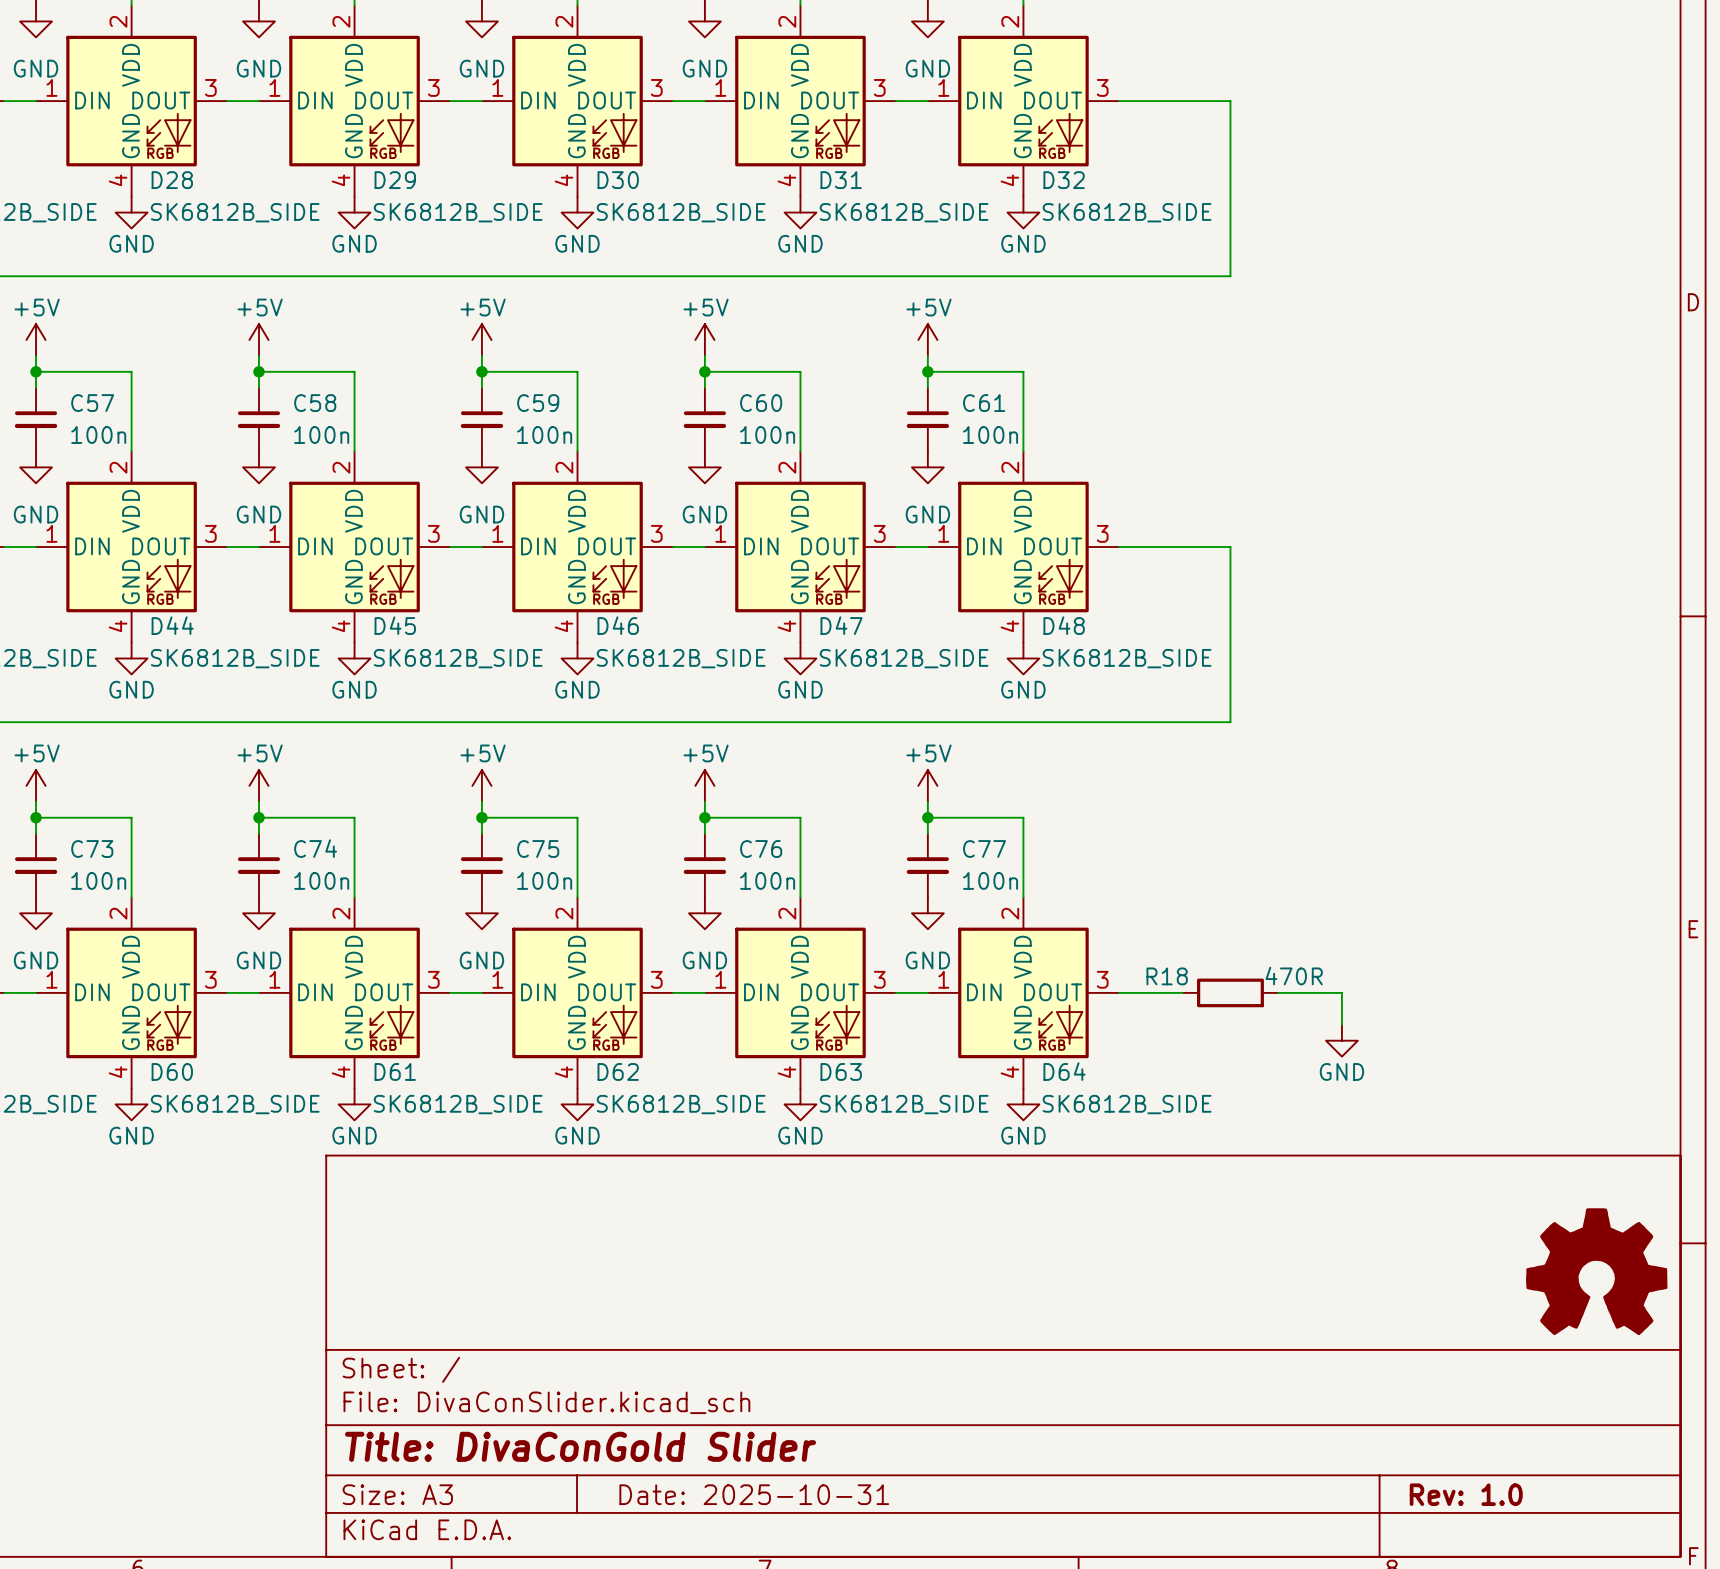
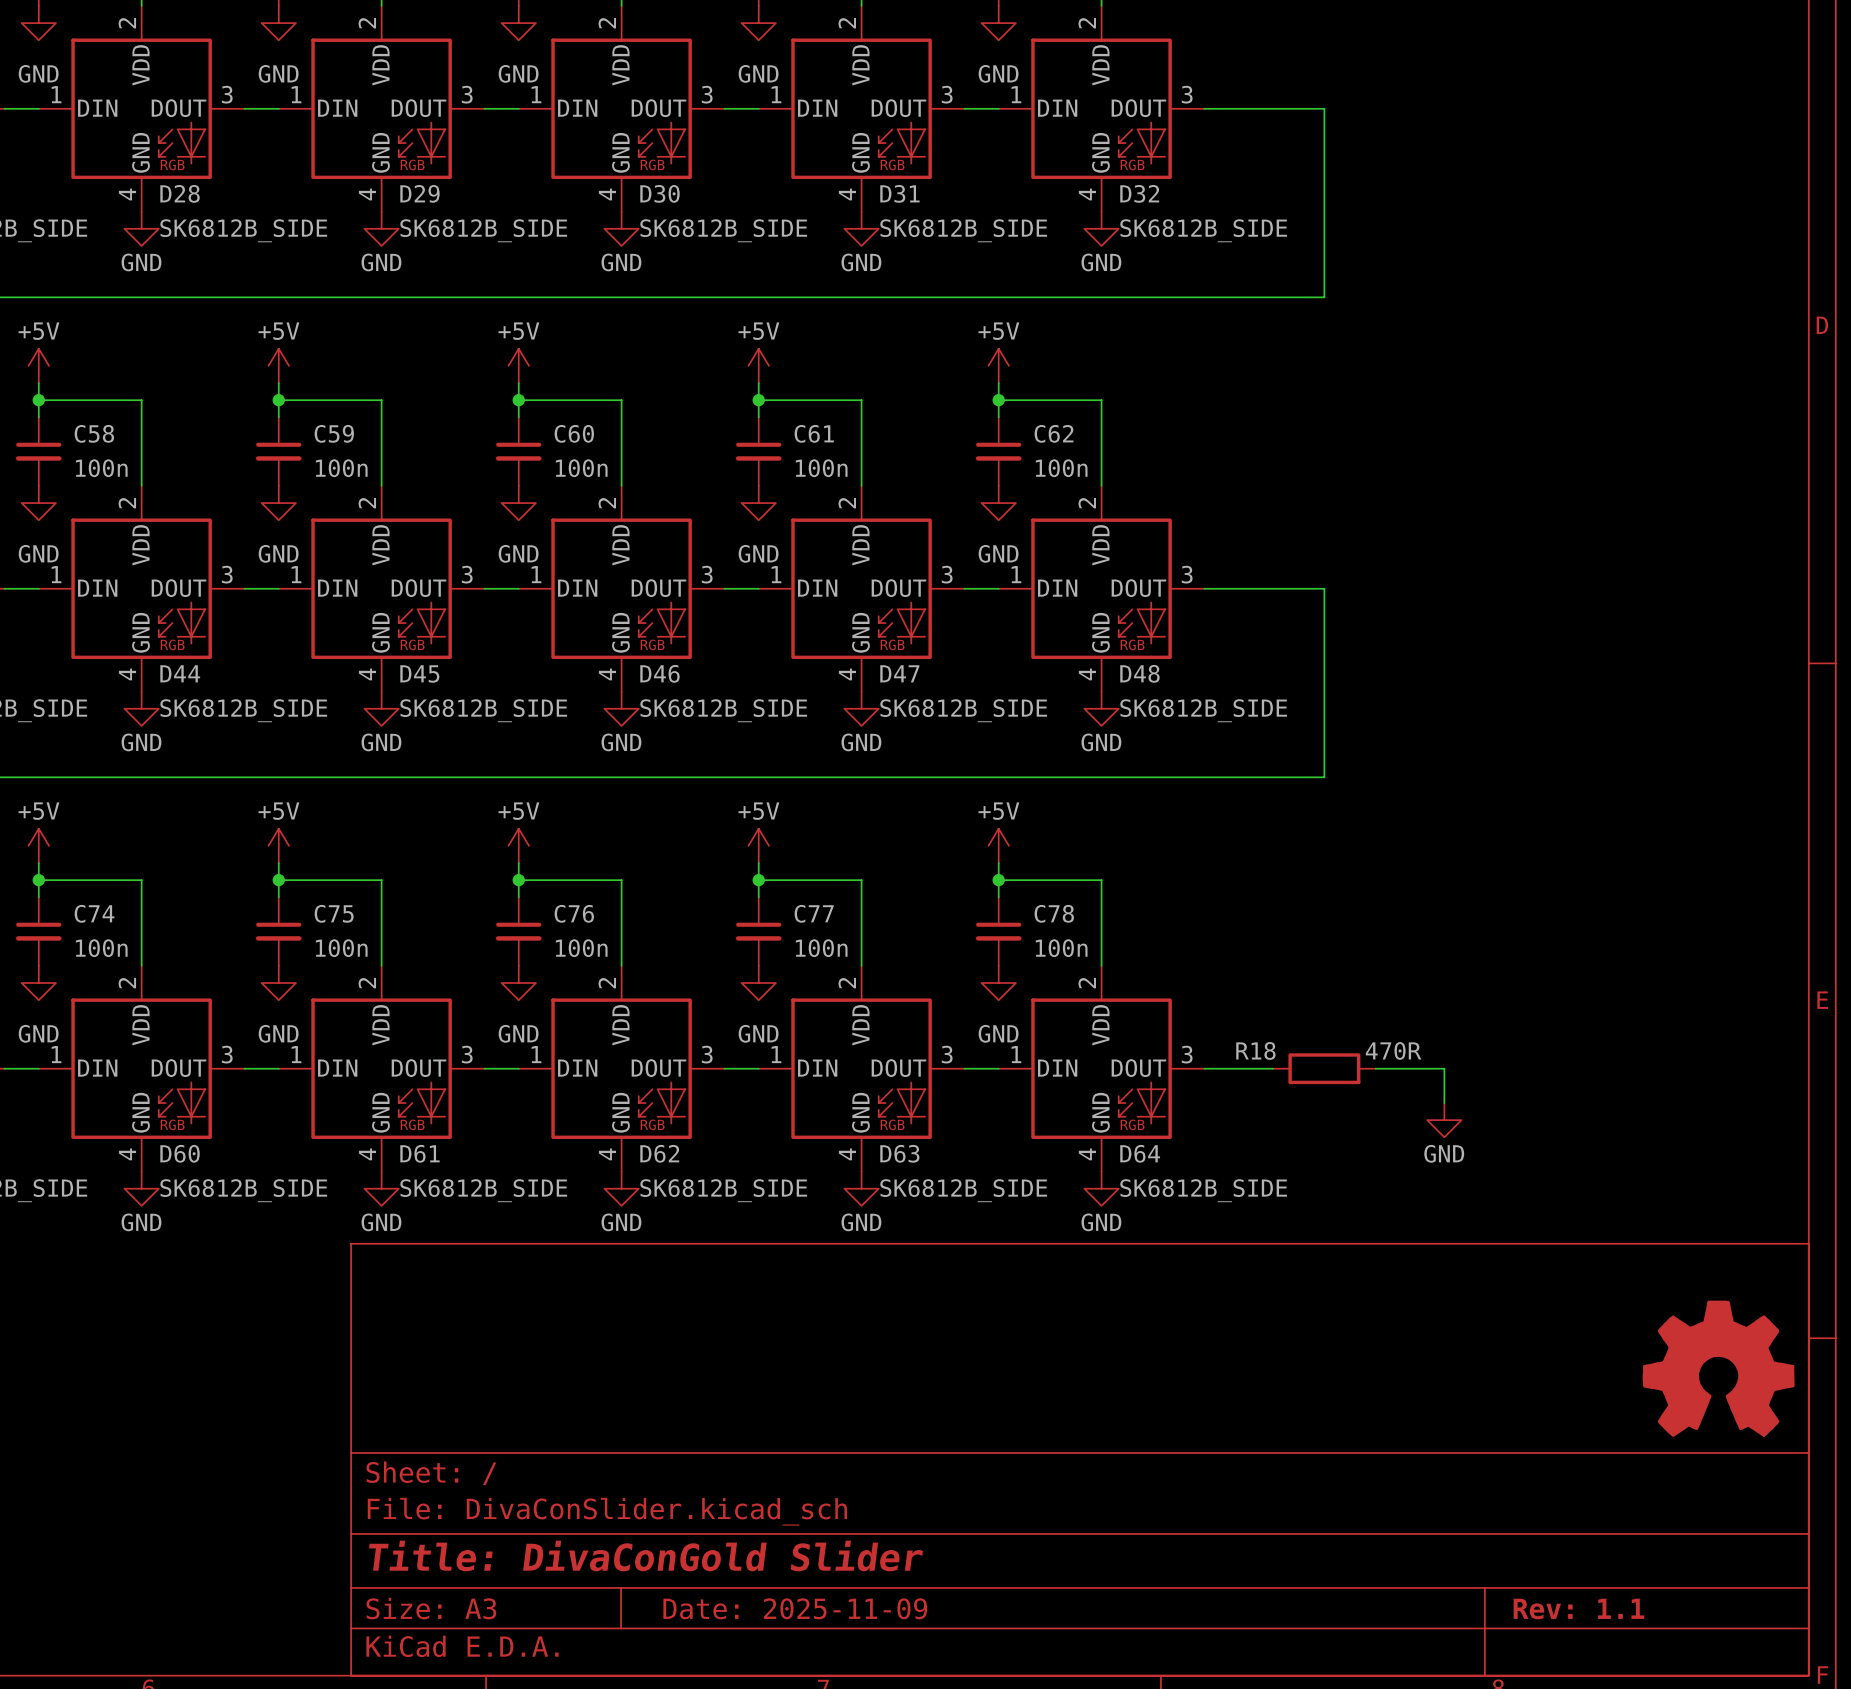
C57 name: C57 (92, 403) -> C58 (94, 433)
C58 name: C58 (315, 403) -> C59 (334, 433)
C59 name: C59 (538, 403) -> C60 (574, 433)
C60 name: C60 (761, 403) -> C61 (814, 433)
C61 name: C61 (984, 403) -> C62 (1054, 433)
C74 name: C74 (315, 848) -> C75 (334, 913)
C73 name: C73 (92, 849) -> C74 (94, 913)
C75 name: C75 (538, 849) -> C76 (574, 913)
C76 name: C76 (761, 849) -> C77 (814, 913)
C77 name: C77 (984, 849) -> C78 (1054, 913)
title block: Date: 2025-10-31 (754, 1494) -> Date: 2025-11-09 (795, 1608)
title block: Rev: 1.0 (1466, 1494) -> Rev: 1.1 (1578, 1608)

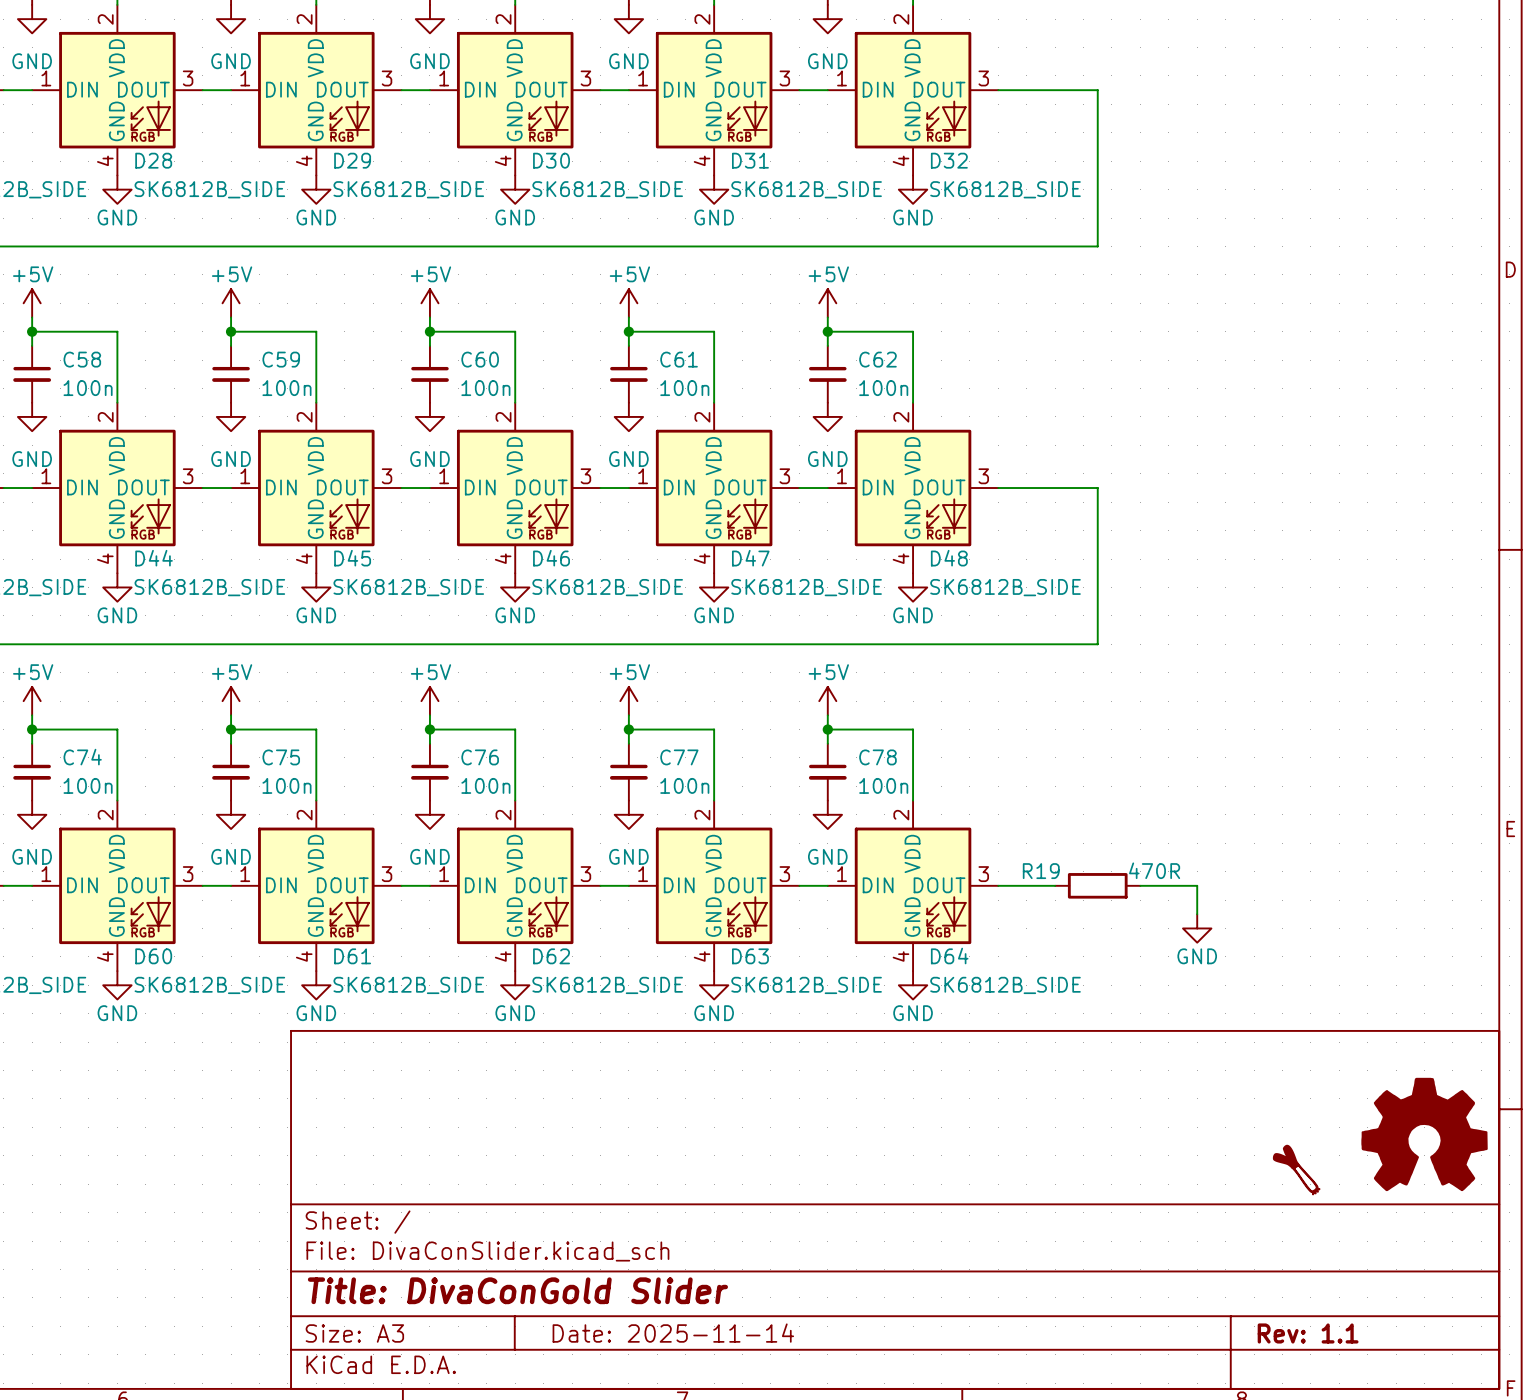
R18 name: R18 (1255, 1050) -> R19 (1041, 871)
part: none -> (1296, 1170)
title block: Date: 2025-11-09 (795, 1608) -> Date: 2025-11-14 (673, 1333)

